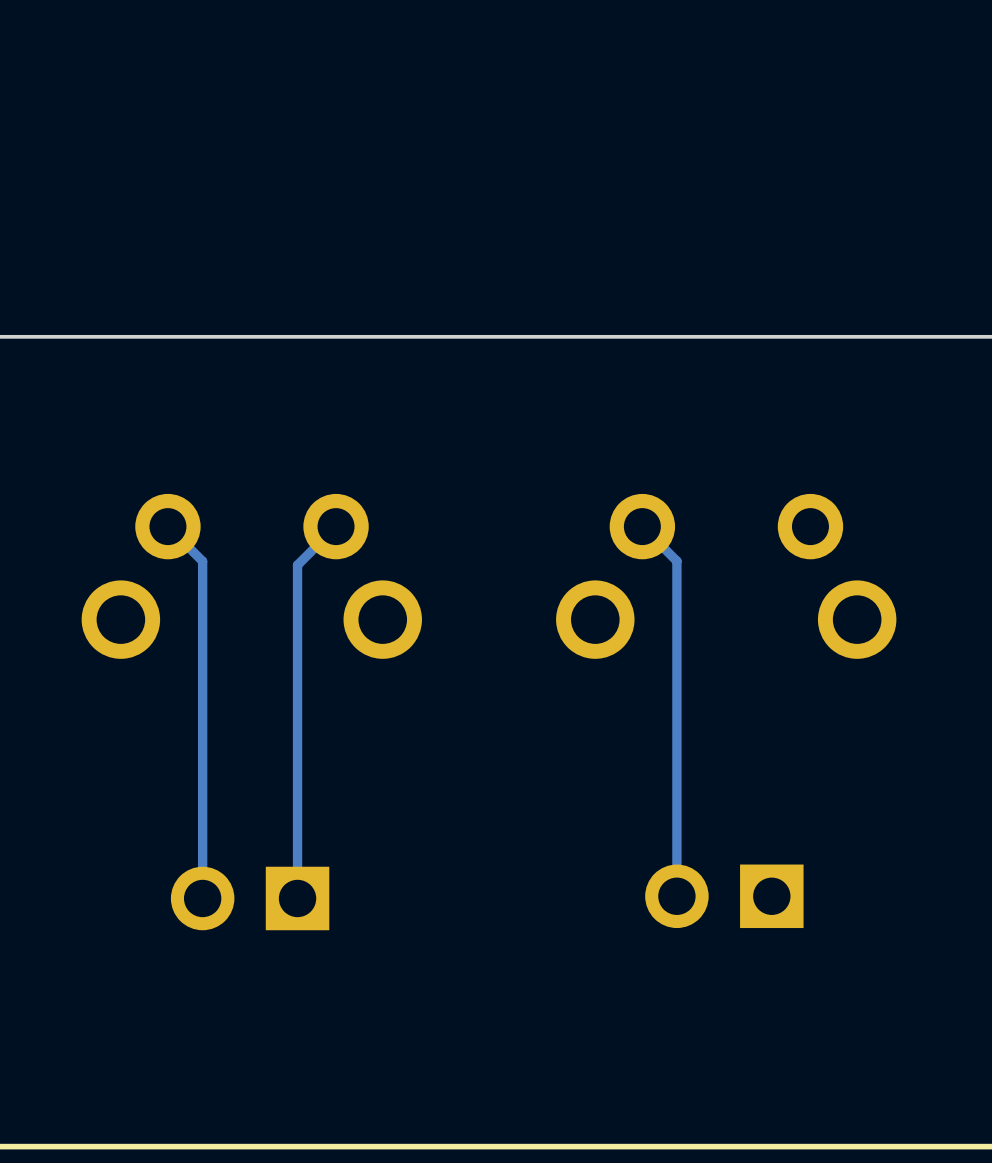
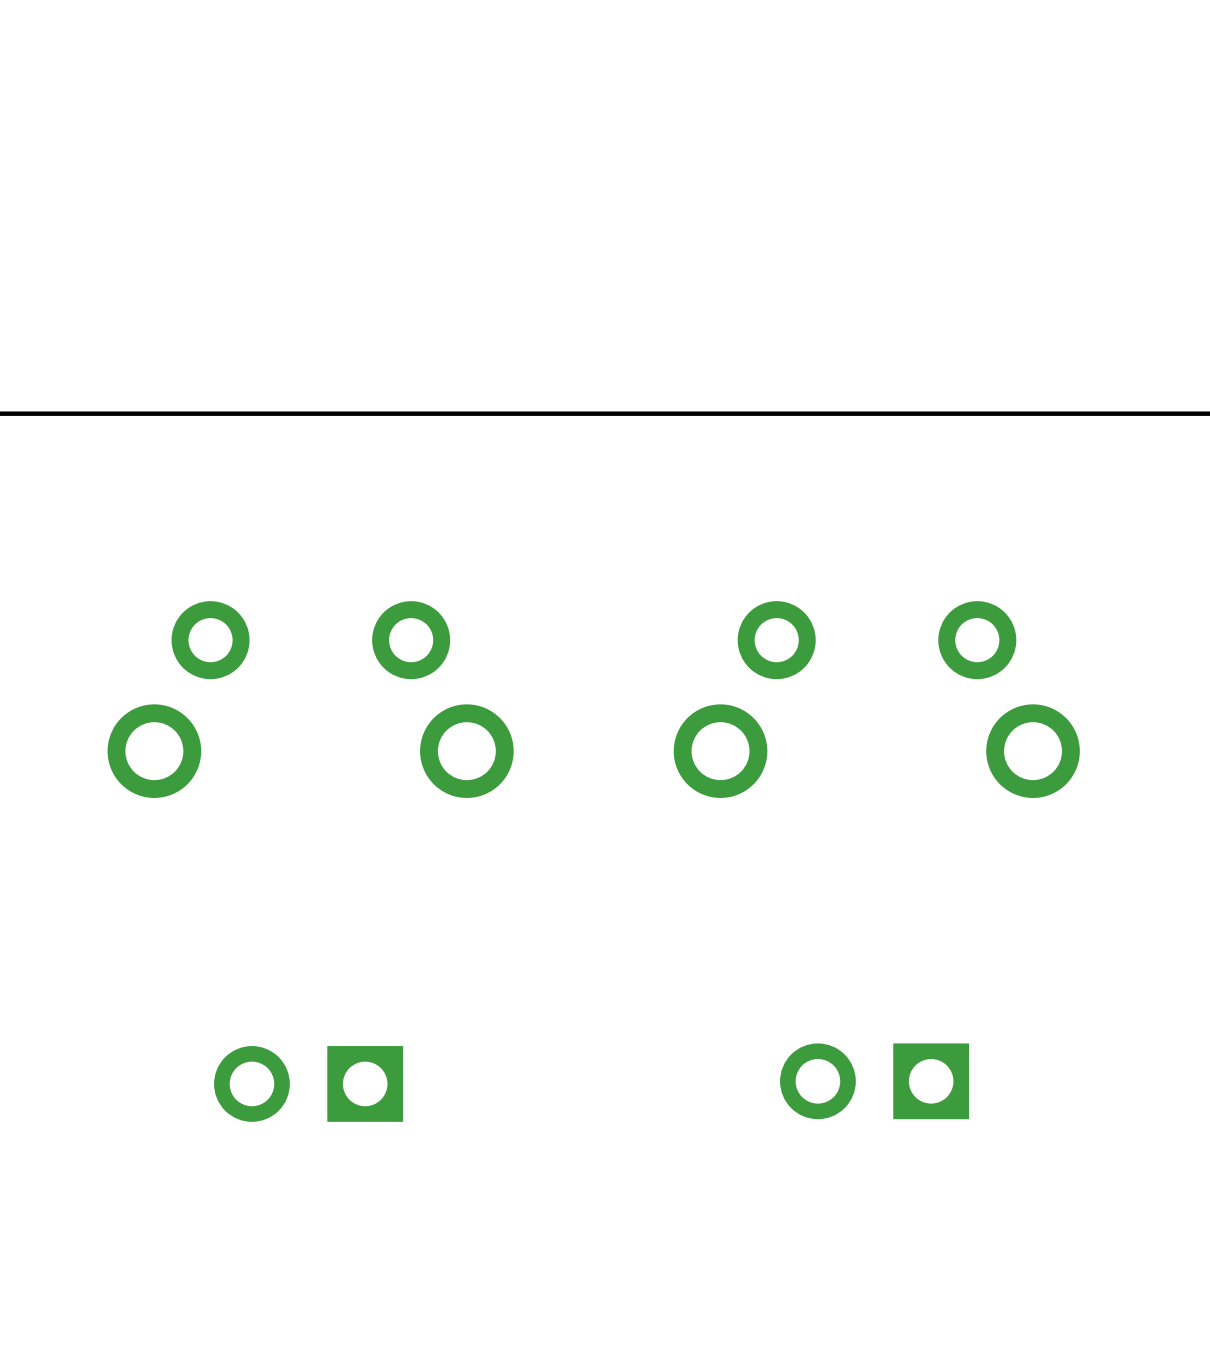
track: (167, 526) (202, 561) (202, 898) -> none
track: (336, 526) (297, 565) (297, 898) -> none
track: (642, 526) (676, 561) (676, 896) -> none

